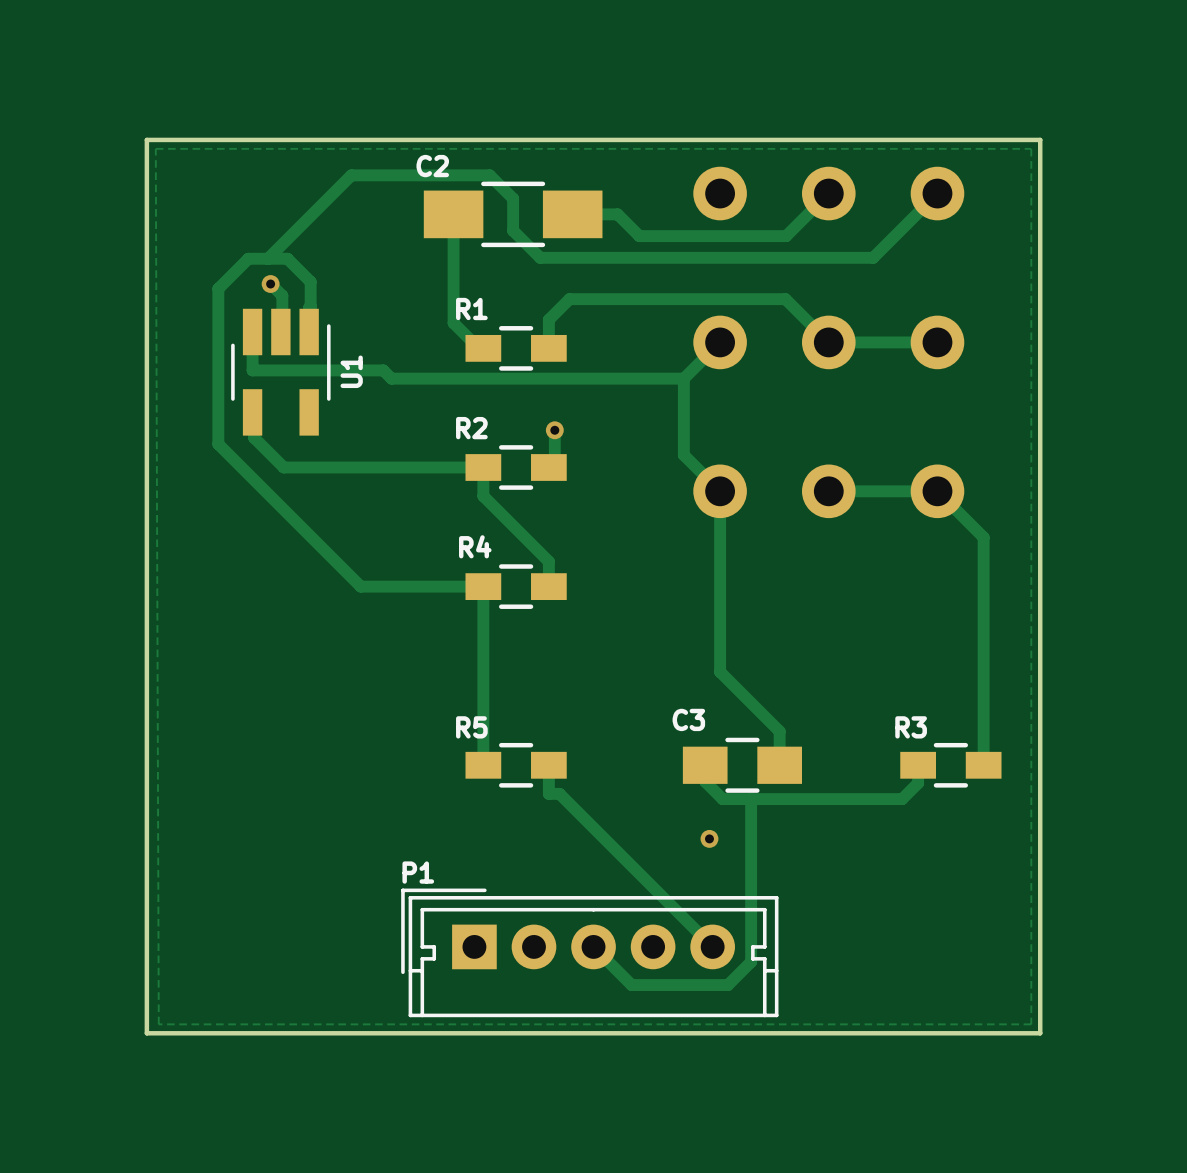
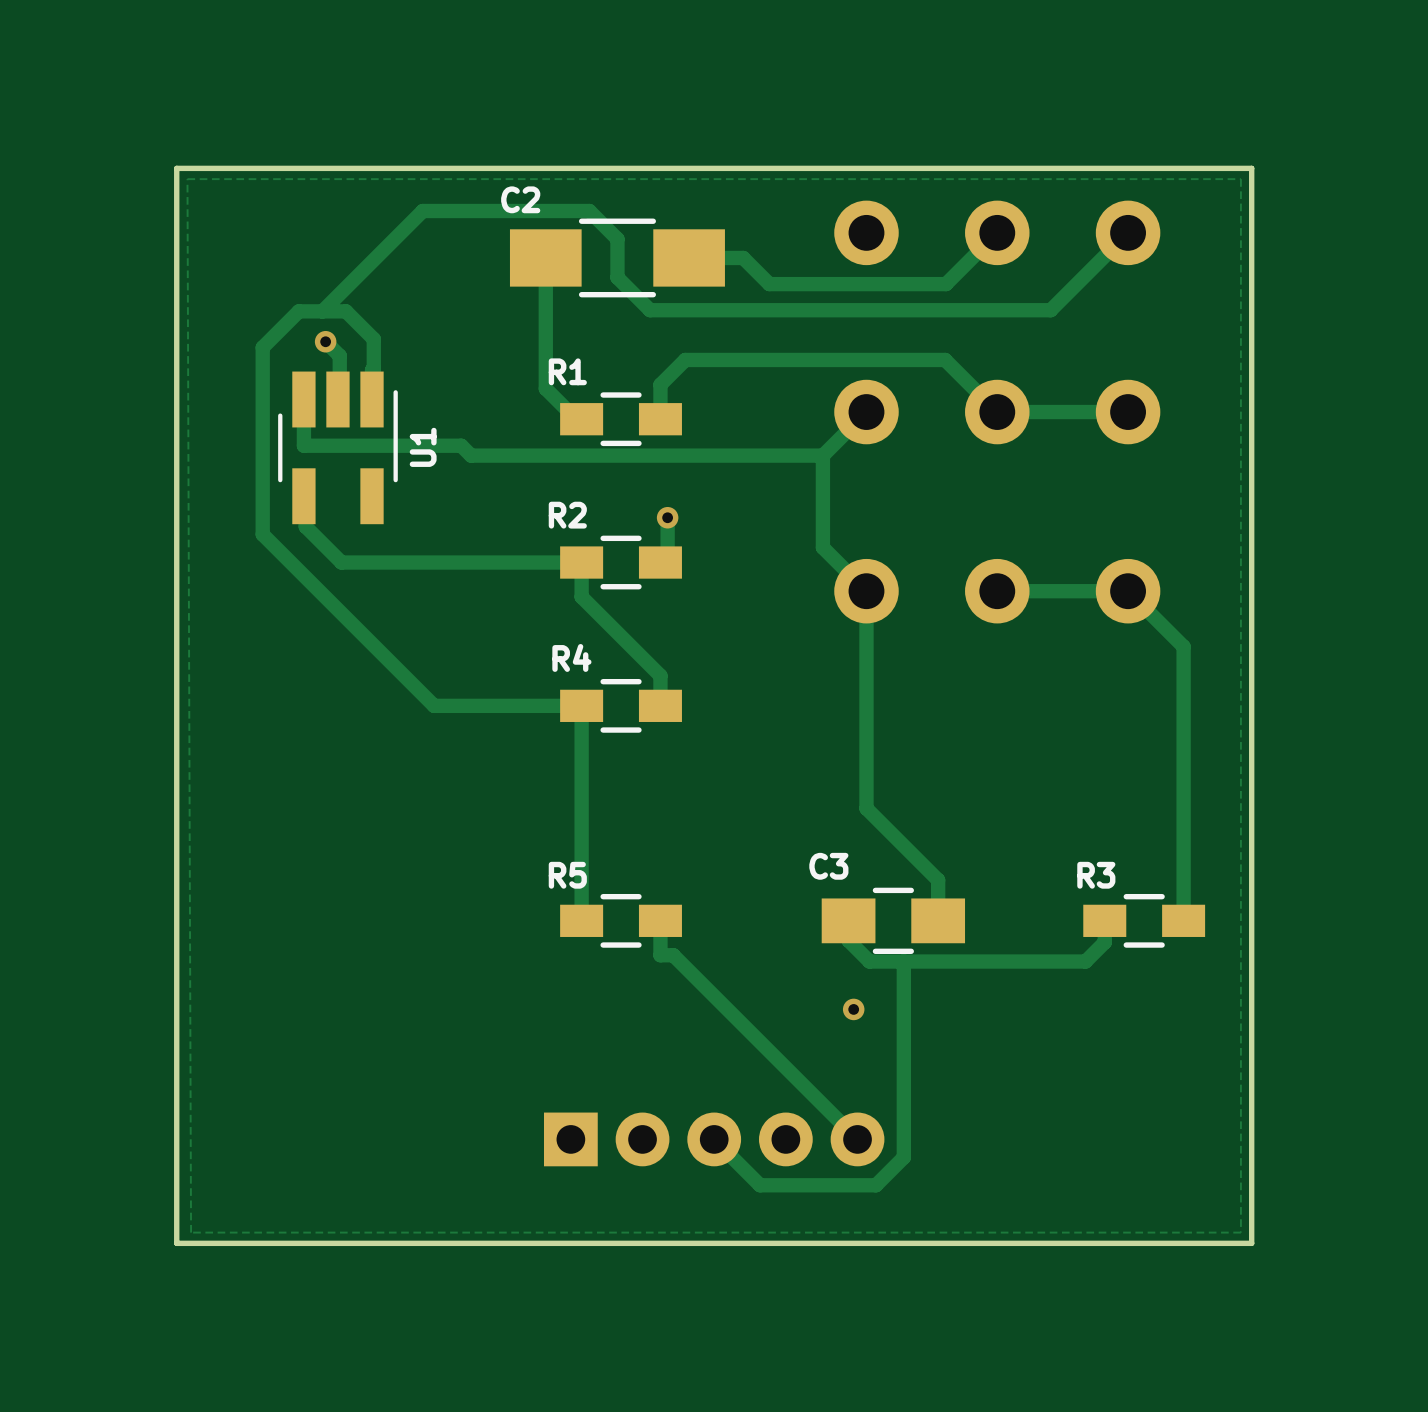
P1: (589, 952) -> none

